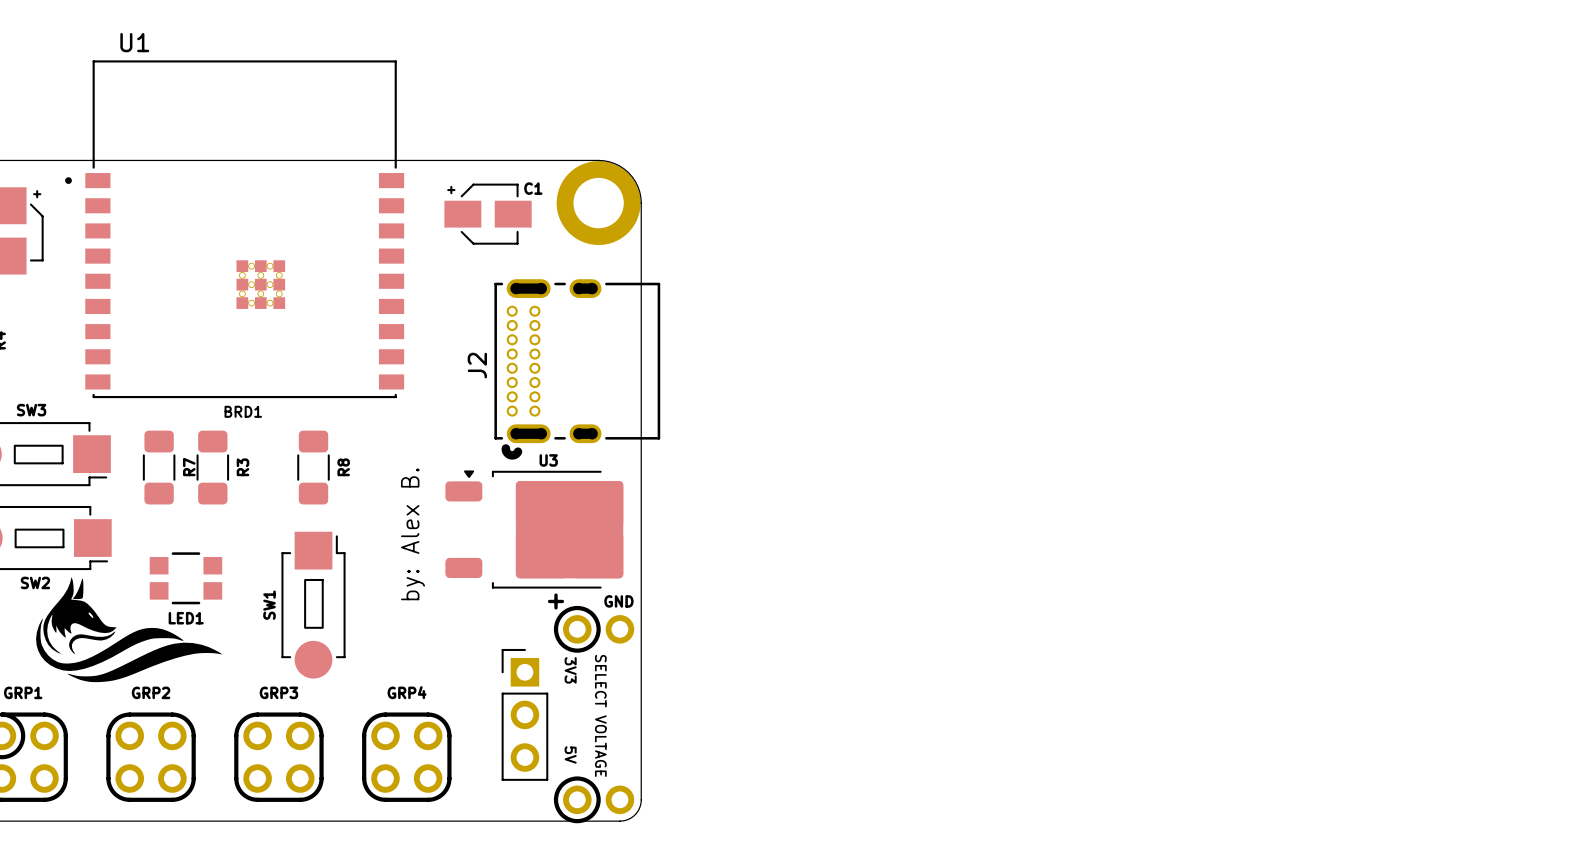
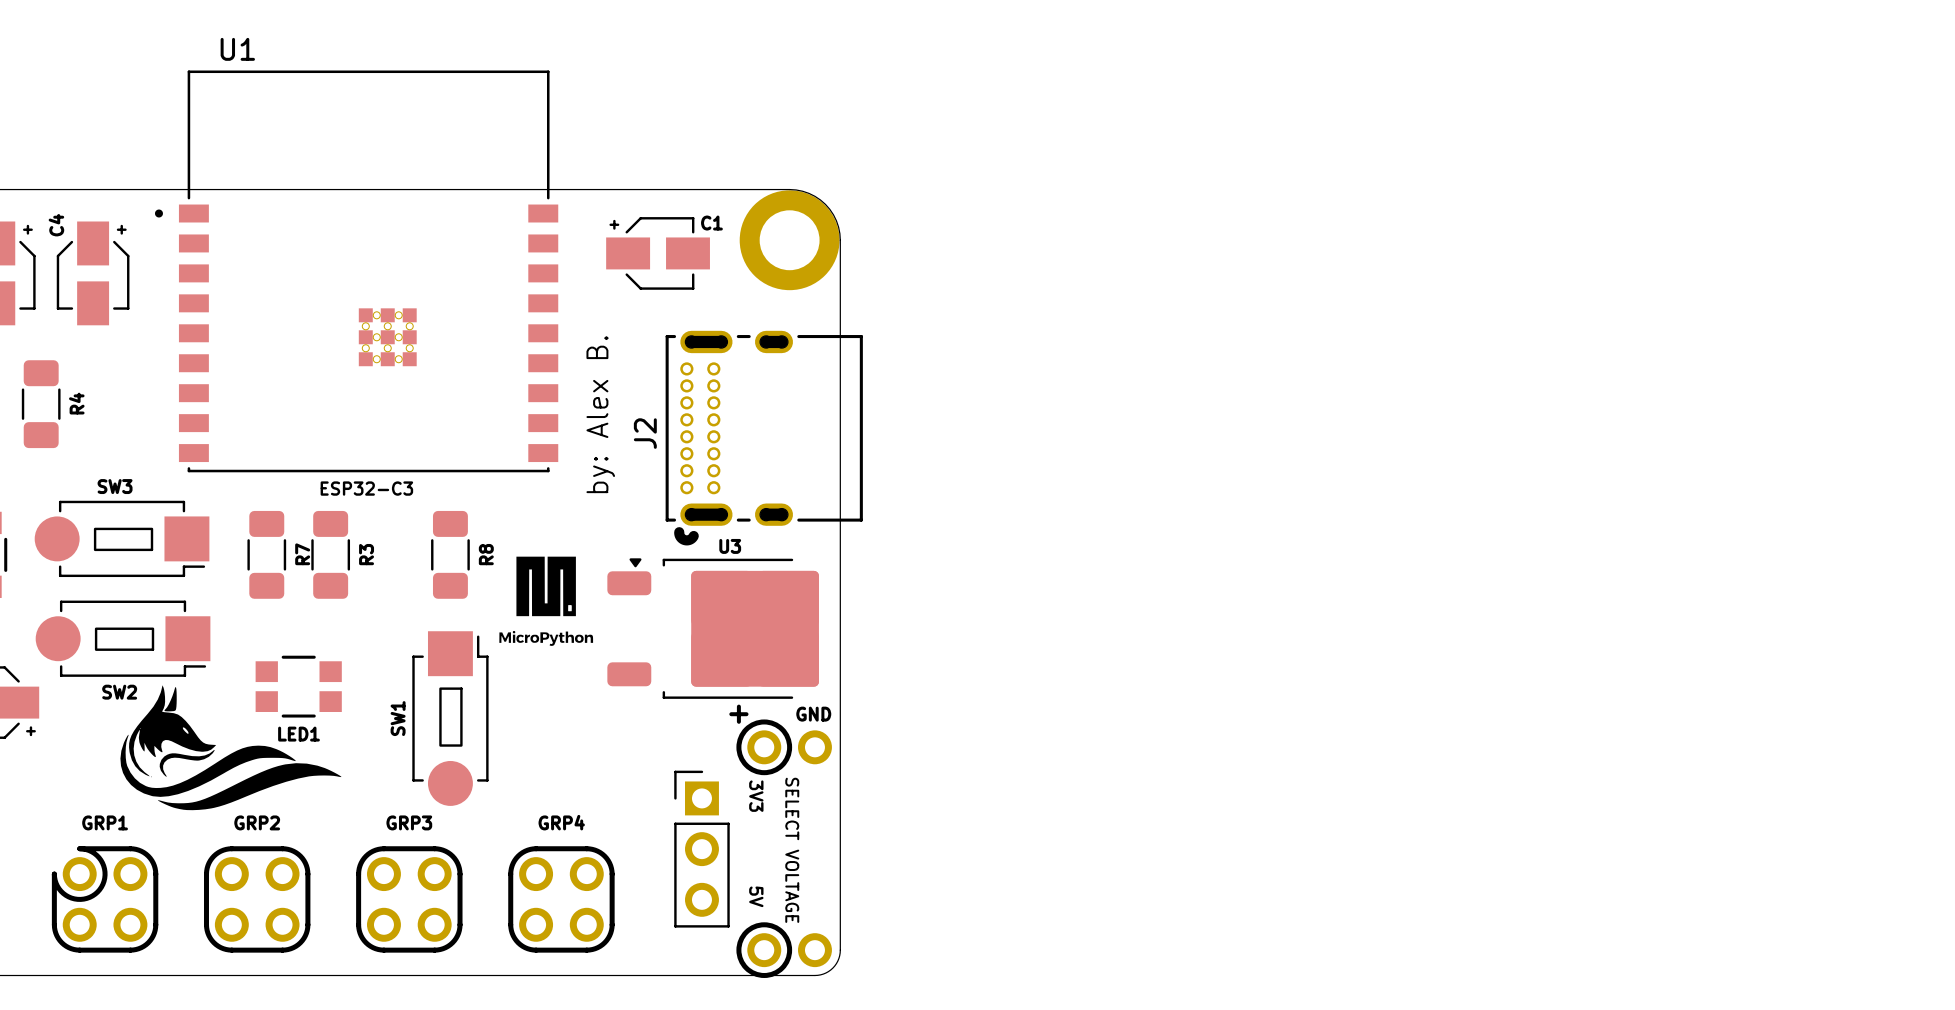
BRD1 name: BRD1 (243, 411) -> ESP32-C3 (366, 488)
drawing: none -> [499, 556, 594, 646]
text position: by: Alex B. (413, 534) -> by: Alex B. (600, 414)

